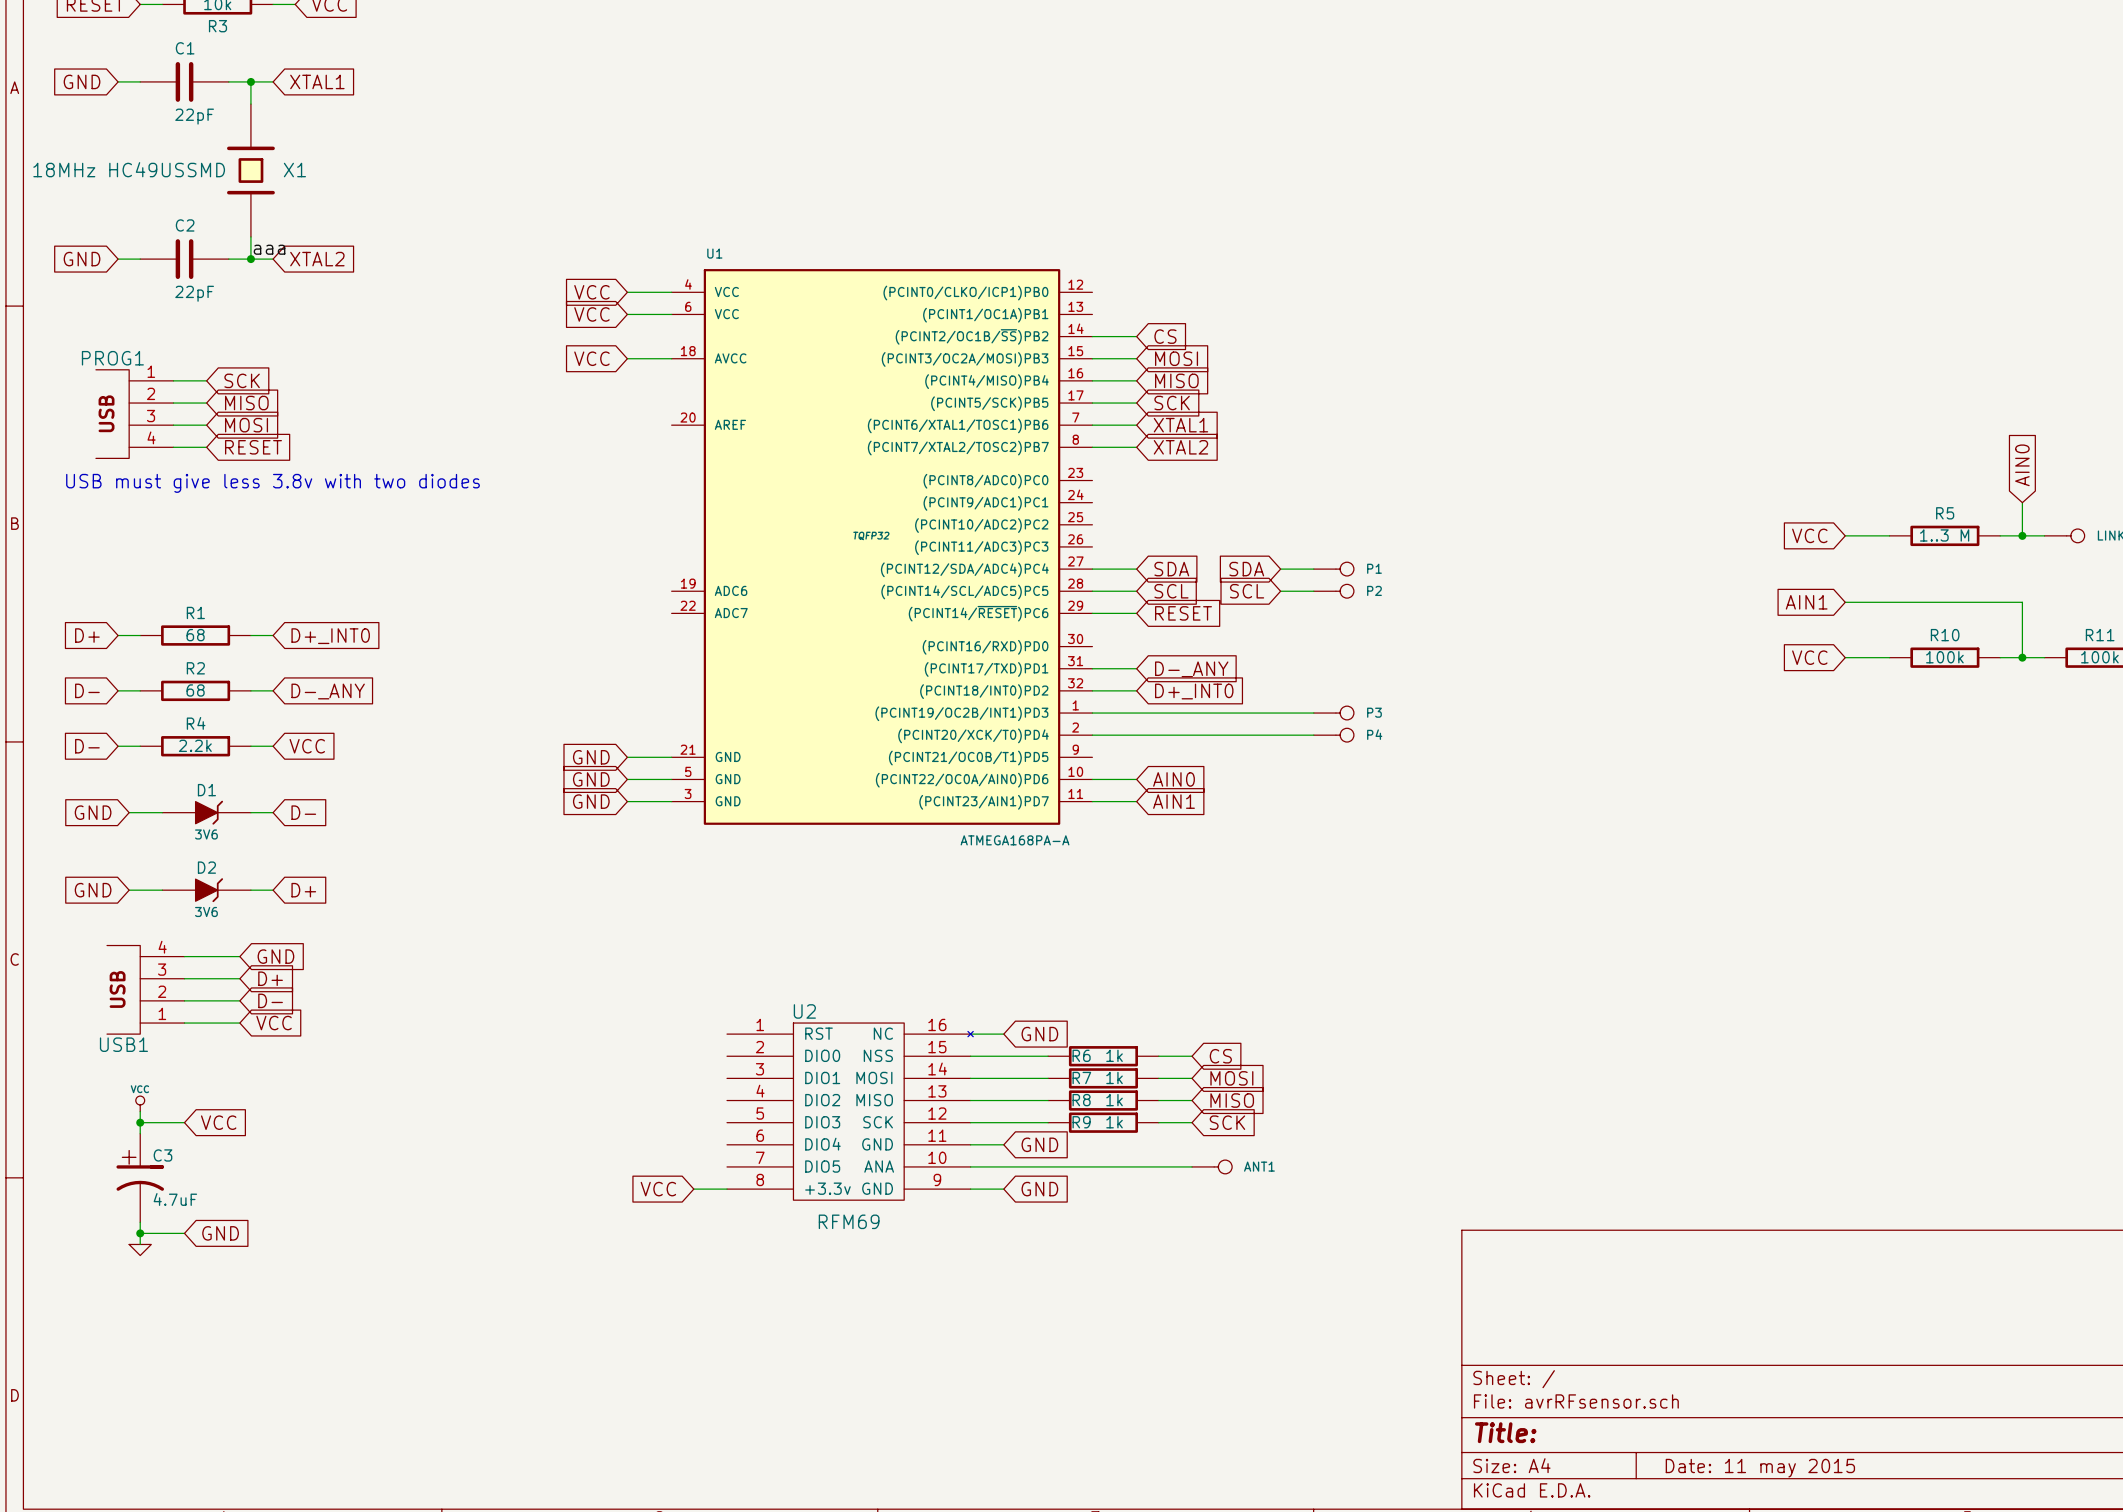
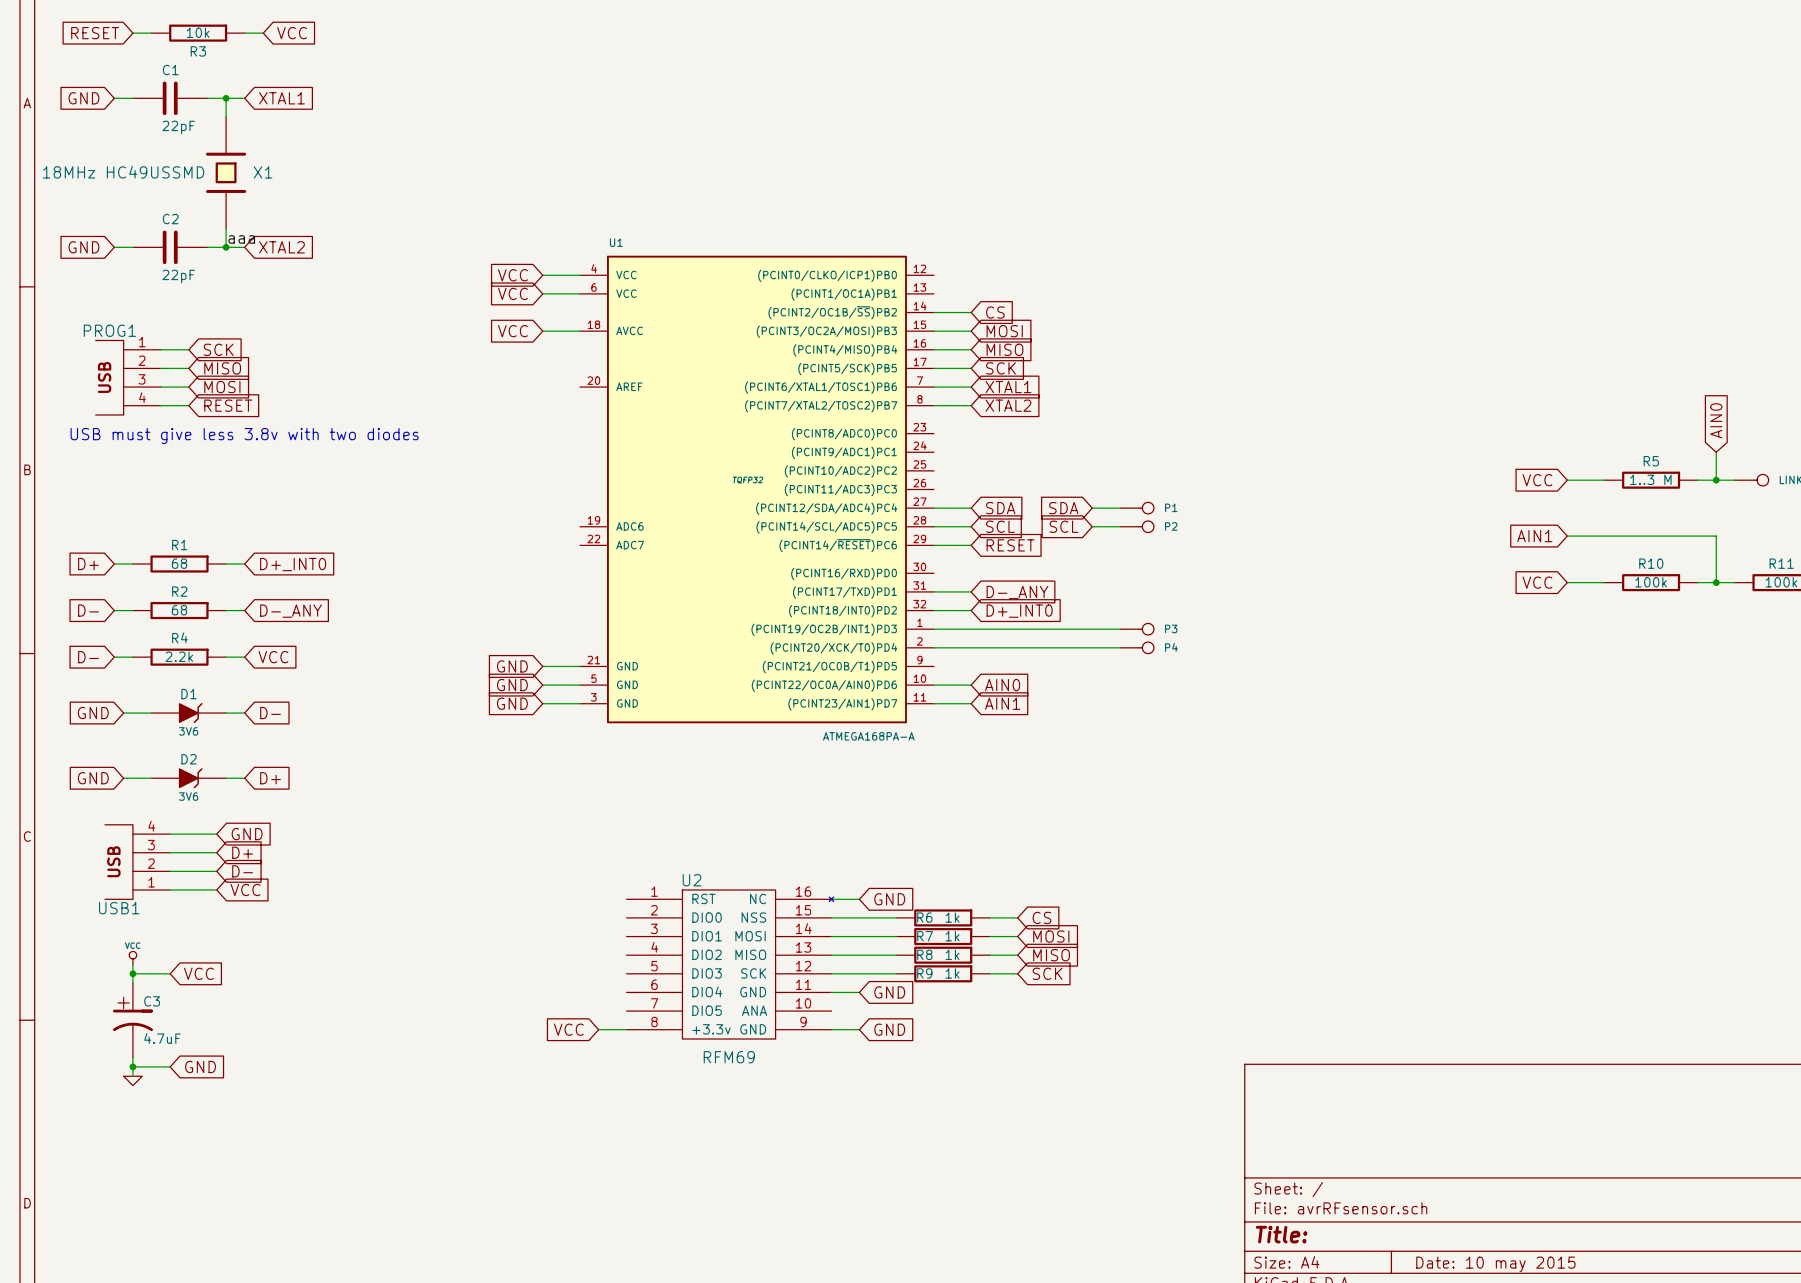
wire: (970, 1166) (1192, 1166) -> none
ANT1: (1212, 1166) -> none
title block: Date: 11 may 2015 (1760, 1468) -> Date: 10 may 2015 (1495, 1264)

